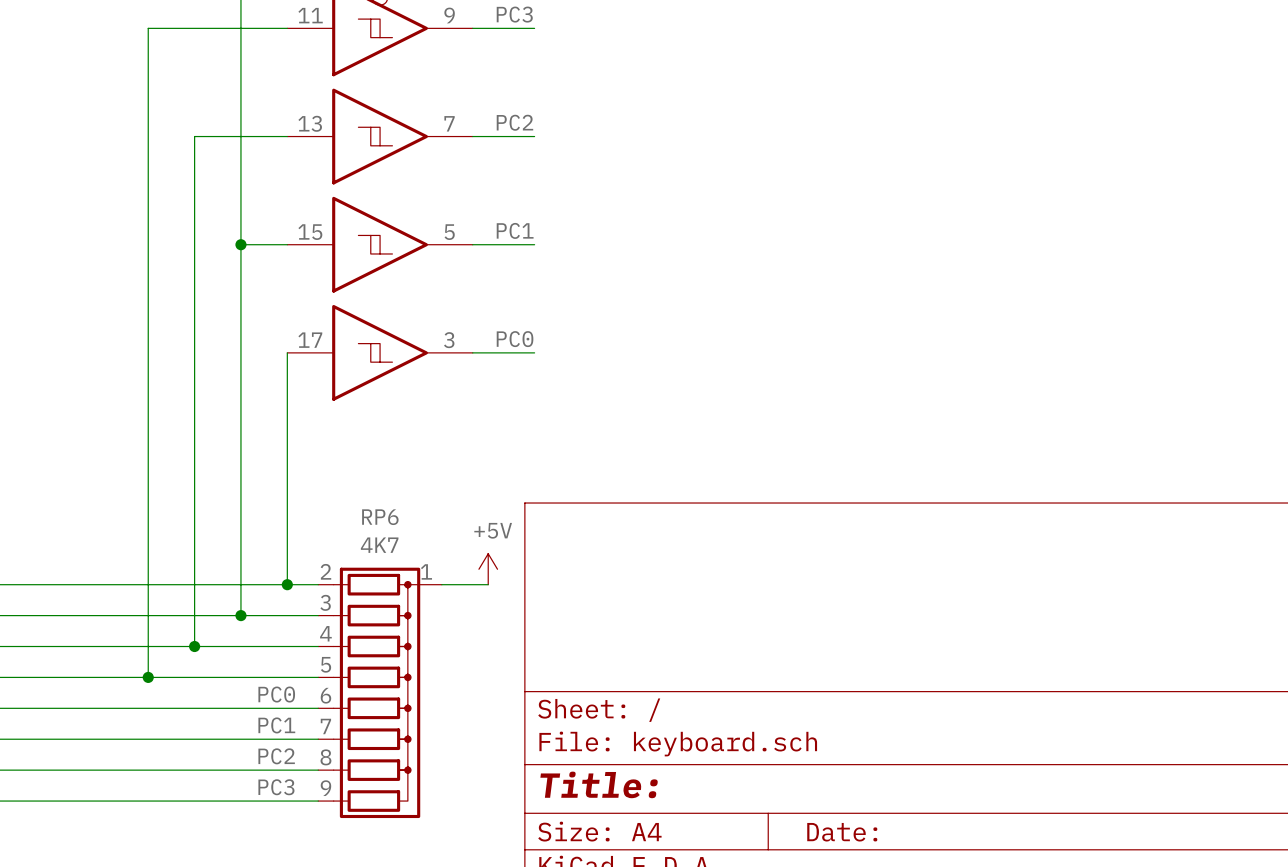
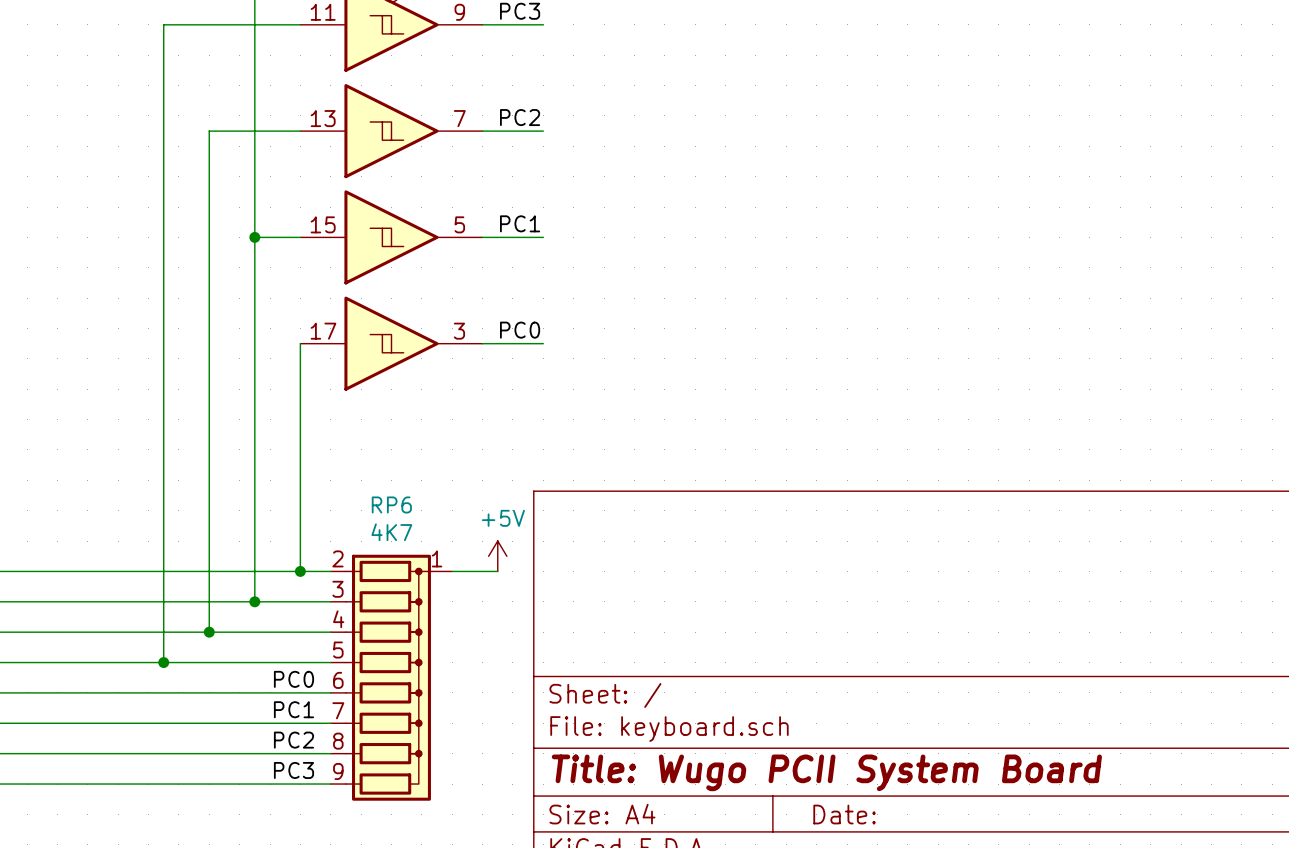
title block: Title: (599, 784) -> Title: Wugo PCII System Board (826, 772)

